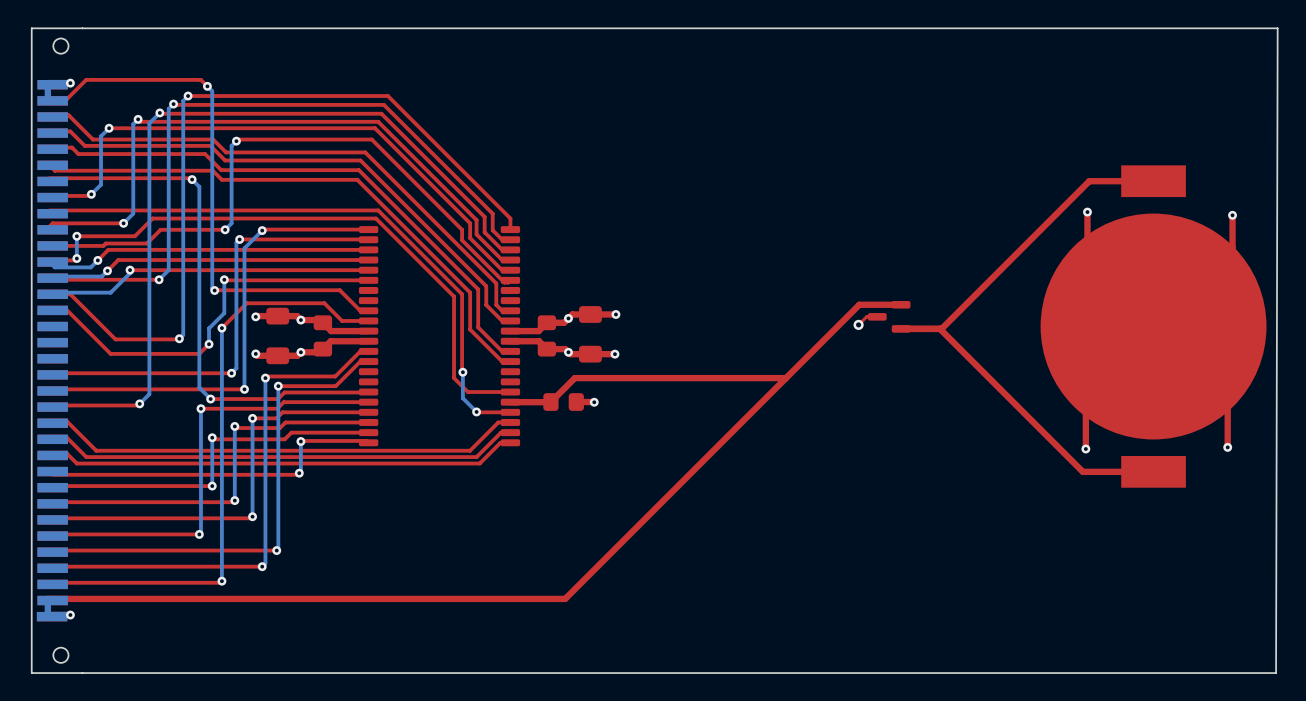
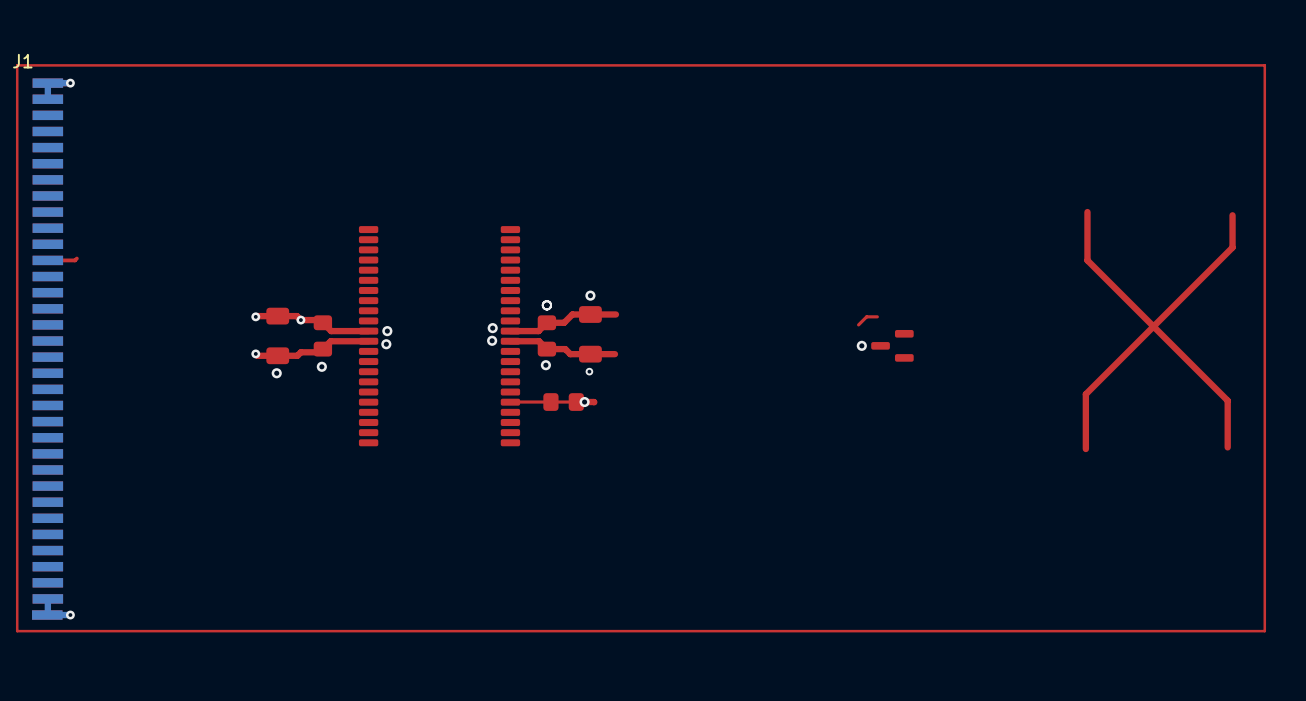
board edge: (82, 28) (1277, 28) (1276, 673) (82, 673) -> none
top track: none -> (1264, 65) (17, 65) (17, 631) (1264, 631) (1264, 65)
top track: (207, 86) (200, 79) (86, 79) (66, 99) (47, 99) -> none
bottom track: (207, 86) (212, 91) (212, 288) (214, 290) -> none
via: (207, 86) -> none
top track: (188, 96) (387, 96) (510, 218) (510, 229) -> none
bottom track: (188, 96) (183, 100) (183, 334) (179, 338) -> none
via: (188, 96) -> none
top track: (173, 104) (383, 104) (492, 213) (492, 230) (502, 239) (510, 239) -> none
bottom track: (173, 104) (168, 108) (168, 270) (159, 279) -> none
via: (173, 104) -> none
top track: (159, 112) (381, 113) (484, 216) (484, 232) (502, 249) (510, 249) -> none
bottom track: (159, 112) (149, 123) (149, 394) (139, 403) -> none
via: (159, 112) -> none
top track: (47, 115) (68, 115) (92, 139) (213, 139) (226, 152) (365, 152) (496, 283) (496, 304) (502, 310) (510, 310) -> none
top track: (138, 119) (140, 121) (378, 121) (476, 220) (476, 234) (502, 260) (510, 260) -> none
bottom track: (138, 119) (133, 124) (133, 213) (123, 223) -> none
via: (138, 119) -> none
top track: (109, 128) (375, 128) (470, 223) (470, 238) (502, 270) (510, 270) -> none
bottom track: (109, 128) (101, 136) (101, 184) (91, 194) -> none
via: (109, 128) -> none
top track: (47, 131) (70, 131) (84, 145) (210, 145) (225, 160) (360, 160) (486, 286) (486, 305) (502, 320) (510, 320) -> none
top track: (236, 141) (238, 139) (371, 139) (462, 229) (462, 240) (504, 282) (510, 280) -> none
bottom track: (236, 141) (231, 145) (231, 223) (225, 229) -> none
via: (236, 141) -> none
top track: (47, 147) (72, 147) (78, 154) (205, 154) (221, 170) (358, 170) (478, 289) (478, 327) (502, 351) (510, 351) -> none
top track: (47, 163) (54, 170) (212, 170) (221, 179) (357, 179) (470, 292) (470, 329) (502, 361) (510, 361) -> none
top track: (49, 178) (192, 179) -> none
bottom track: (192, 179) (199, 186) (199, 387) (210, 399) -> none
via: (192, 179) -> none
top track: (1153, 181) (1089, 181) (941, 328) (901, 328) -> none
top track: (91, 194) (89, 195) (47, 195) -> none
via: (91, 194) -> none
top track: (49, 210) (378, 210) (462, 294) (462, 372) -> none
via: (1087, 212) -> none
via: (1232, 215) -> none
top track: (123, 223) (52, 223) (47, 228) -> none
via: (123, 223) -> none
top track: (225, 229) (160, 229) (146, 243) (52, 245) -> none
via: (225, 229) -> none
top track: (368, 229) (262, 230) -> none
bottom track: (262, 230) (244, 248) (244, 389) -> none
via: (262, 230) -> none
top track: (76, 236) (134, 236) (152, 218) (375, 218) (454, 296) (454, 378) (467, 392) (510, 392) -> none
bottom track: (76, 236) (76, 258) -> none
via: (76, 236) -> none
bottom track: (239, 239) (236, 242) (236, 368) (231, 373) -> none
via: (239, 239) -> none
top track: (368, 239) (239, 239) -> none
top track: (368, 249) (108, 249) (97, 260) -> none
via: (76, 258) -> none
bottom track: (97, 260) (90, 267) (54, 267) (47, 260) -> none
via: (97, 260) -> none
top track: (368, 260) (118, 260) (107, 270) -> none
bottom track: (107, 270) (101, 276) (47, 276) -> none
via: (107, 270) -> none
bottom track: (130, 270) (130, 273) (110, 292) (47, 292) -> none
via: (130, 270) -> none
top track: (368, 270) (130, 270) -> none
top track: (159, 279) (51, 279) -> none
via: (159, 279) -> none
top track: (224, 279) (368, 280) -> none
bottom track: (224, 279) (224, 313) (209, 328) (209, 344) -> none
via: (224, 279) -> none
top track: (214, 290) (339, 290) (360, 310) (368, 310) -> none
via: (214, 290) -> none
top track: (52, 294) (70, 294) (115, 339) (179, 338) -> none
via: none -> (590, 295)
top track: (901, 304) (859, 304) (565, 598) (47, 598) -> none
via: none -> (546, 305)
top track: (60, 308) (65, 308) (110, 353) (199, 353) (209, 344) -> none
via: (615, 314) -> none
part position: (889, 316) -> (892, 345)
via: (568, 318) -> none
top track: (368, 320) (342, 320) (324, 303) (246, 303) (221, 328) -> none
via position: (858, 324) -> (861, 345)
part: (1153, 326) -> none
bottom track: (221, 328) (221, 581) -> none
via: (221, 328) -> none
via: none -> (492, 328)
top track: (939, 328) (1082, 471) (1153, 471) -> none
via: none -> (387, 331)
via: (179, 338) -> none
via: none -> (492, 340)
via: (209, 344) -> none
via: none -> (386, 344)
J1: none -> (47, 349)
part: (57, 350) -> none
top track: (368, 351) (360, 351) (335, 376) (265, 376) (265, 378) -> none
via: (300, 352) -> none
via: (568, 352) -> none
via: (614, 354) -> none
top track: (368, 361) (360, 361) (335, 386) (278, 386) -> none
via: none -> (545, 365)
via: none -> (321, 366)
via: none -> (589, 371)
bottom track: (462, 372) (462, 398) (476, 411) -> none
via: (462, 372) -> none
top track: (231, 373) (47, 373) -> none
via: (231, 373) -> none
via: none -> (276, 373)
bottom track: (265, 378) (265, 563) (262, 566) -> none
via: (265, 378) -> none
top track: (786, 378) (574, 378) (550, 402) -> none
bottom track: (278, 386) (278, 548) (276, 550) -> none
via: (278, 386) -> none
top track: (244, 389) (47, 389) -> none
via: (244, 389) -> none
top track: (368, 392) (284, 392) (278, 399) (210, 399) -> none
via: (210, 399) -> none
top track: (368, 402) (283, 402) (277, 408) (200, 408) -> none
top track: (550, 402) (510, 402) -> (576, 402) (510, 402)
via: none -> (584, 402)
via: (594, 402) -> none
top track: (139, 403) (138, 405) (47, 405) -> none
via: (139, 403) -> none
bottom track: (200, 408) (200, 532) (199, 534) -> none
via: (200, 408) -> none
top track: (476, 411) (510, 412) -> none
via: (476, 411) -> none
top track: (368, 412) (282, 412) (276, 418) (252, 418) -> none
bottom track: (252, 418) (252, 516) -> none
via: (252, 418) -> none
top track: (47, 421) (67, 421) (96, 450) (470, 450) (498, 422) (510, 422) -> none
top track: (368, 422) (285, 422) (279, 428) (236, 428) (234, 426) -> none
bottom track: (234, 426) (234, 500) -> none
via: (234, 426) -> none
top track: (368, 432) (291, 432) (284, 439) (213, 439) (212, 437) -> none
top track: (510, 432) (501, 432) (476, 457) (86, 457) (66, 437) (47, 437) -> none
bottom track: (212, 437) (212, 486) -> none
via: (212, 437) -> none
top track: (300, 441) (366, 440) (368, 442) -> none
bottom track: (300, 441) (300, 471) (299, 473) -> none
via: (300, 441) -> none
top track: (510, 442) (500, 442) (479, 463) (76, 463) (67, 453) (47, 453) -> none
via: (1227, 447) -> none
via: (1085, 449) -> none
top track: (299, 473) (297, 474) (52, 474) -> none
via: (299, 473) -> none
top track: (212, 486) (47, 486) -> none
via: (212, 486) -> none
top track: (234, 500) (233, 502) (47, 502) -> none
via: (234, 500) -> none
top track: (252, 516) (250, 518) (47, 518) -> none
via: (252, 516) -> none
top track: (199, 534) (47, 534) -> none
via: (199, 534) -> none
top track: (276, 550) (47, 550) -> none
via: (276, 550) -> none
top track: (262, 566) (47, 566) -> none
via: (262, 566) -> none
top track: (221, 581) (220, 582) (47, 582) -> none
via: (221, 581) -> none

